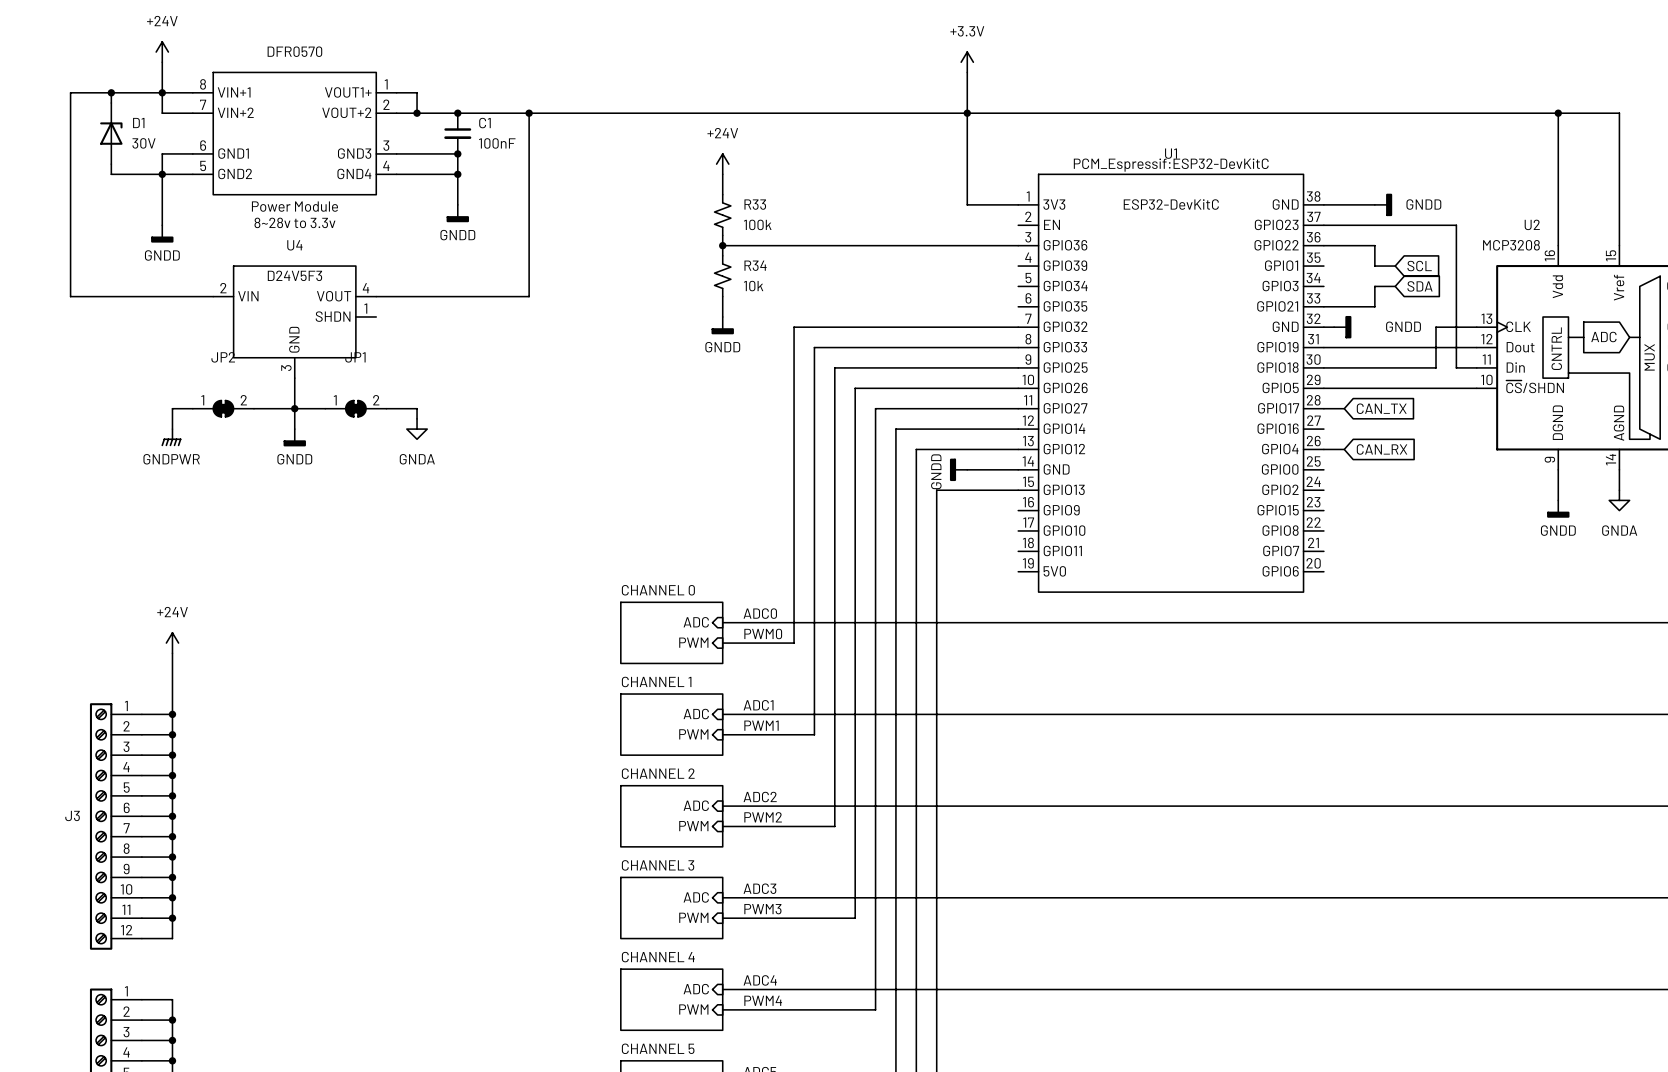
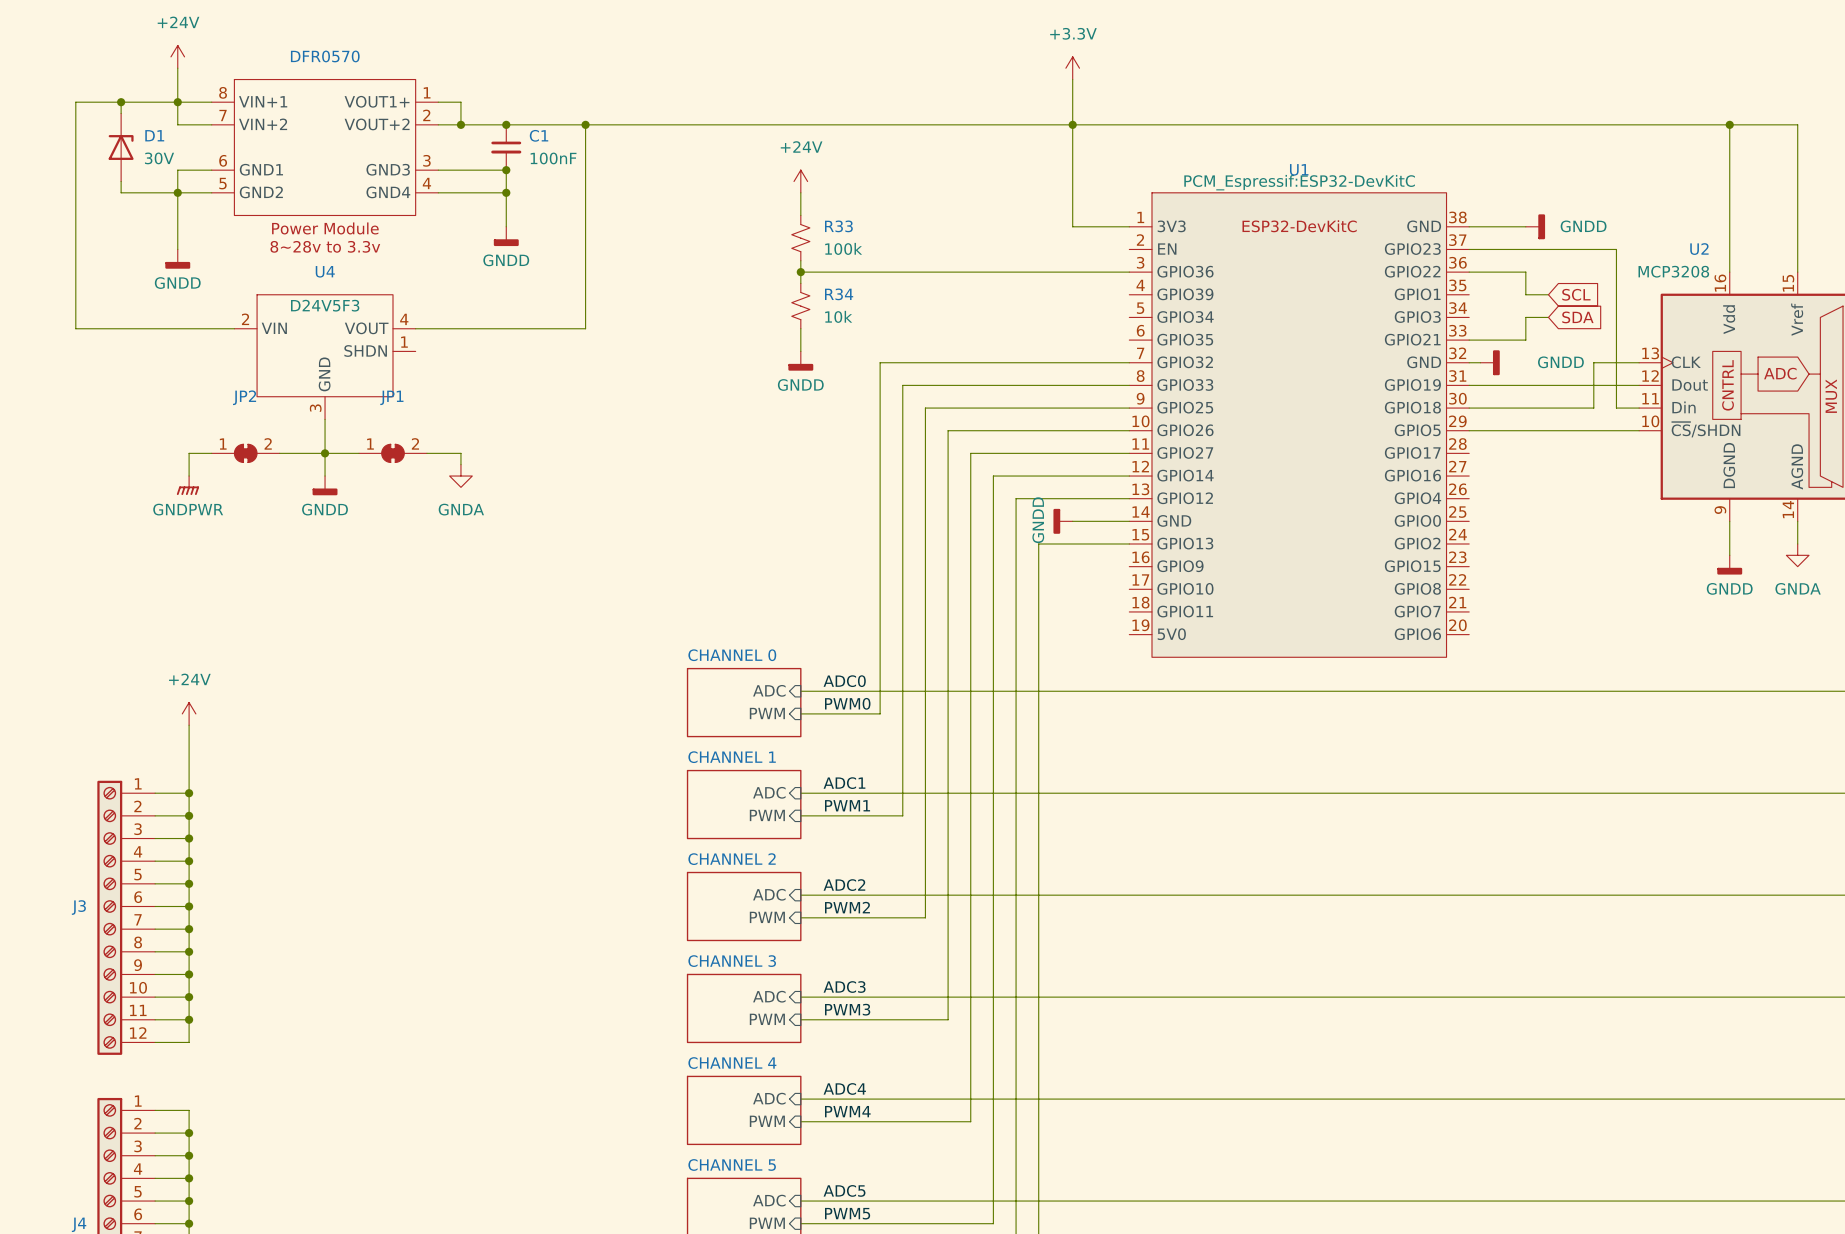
wire: (1323, 408) (1344, 408) -> none
global label: CAN_TX (1381, 408) -> none
wire: (1323, 449) (1344, 449) -> none
global label: CAN_RX (1382, 449) -> none

